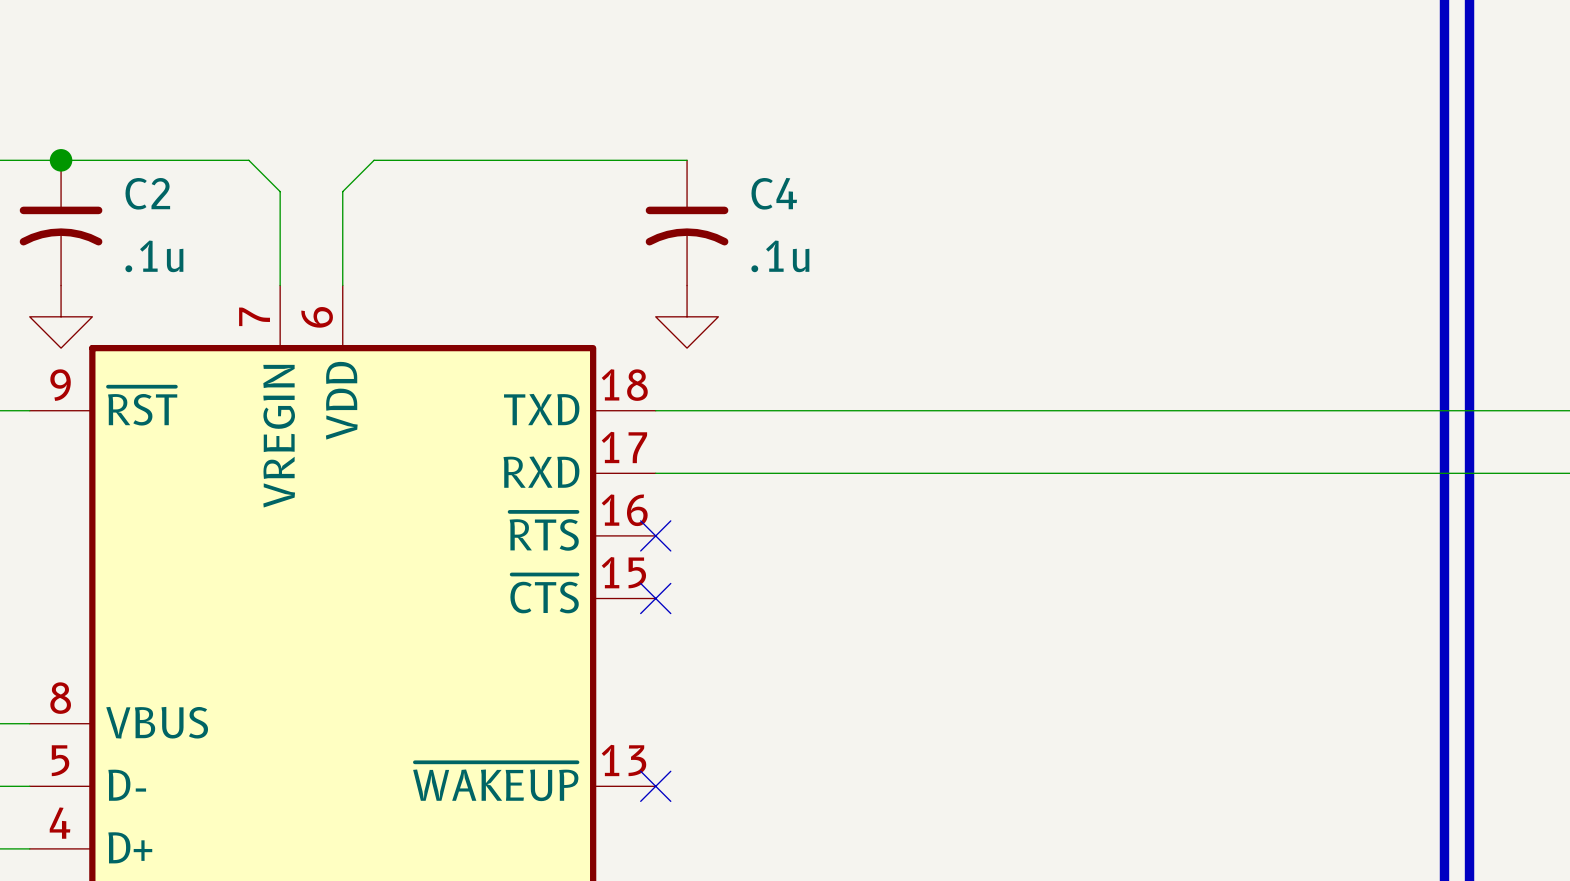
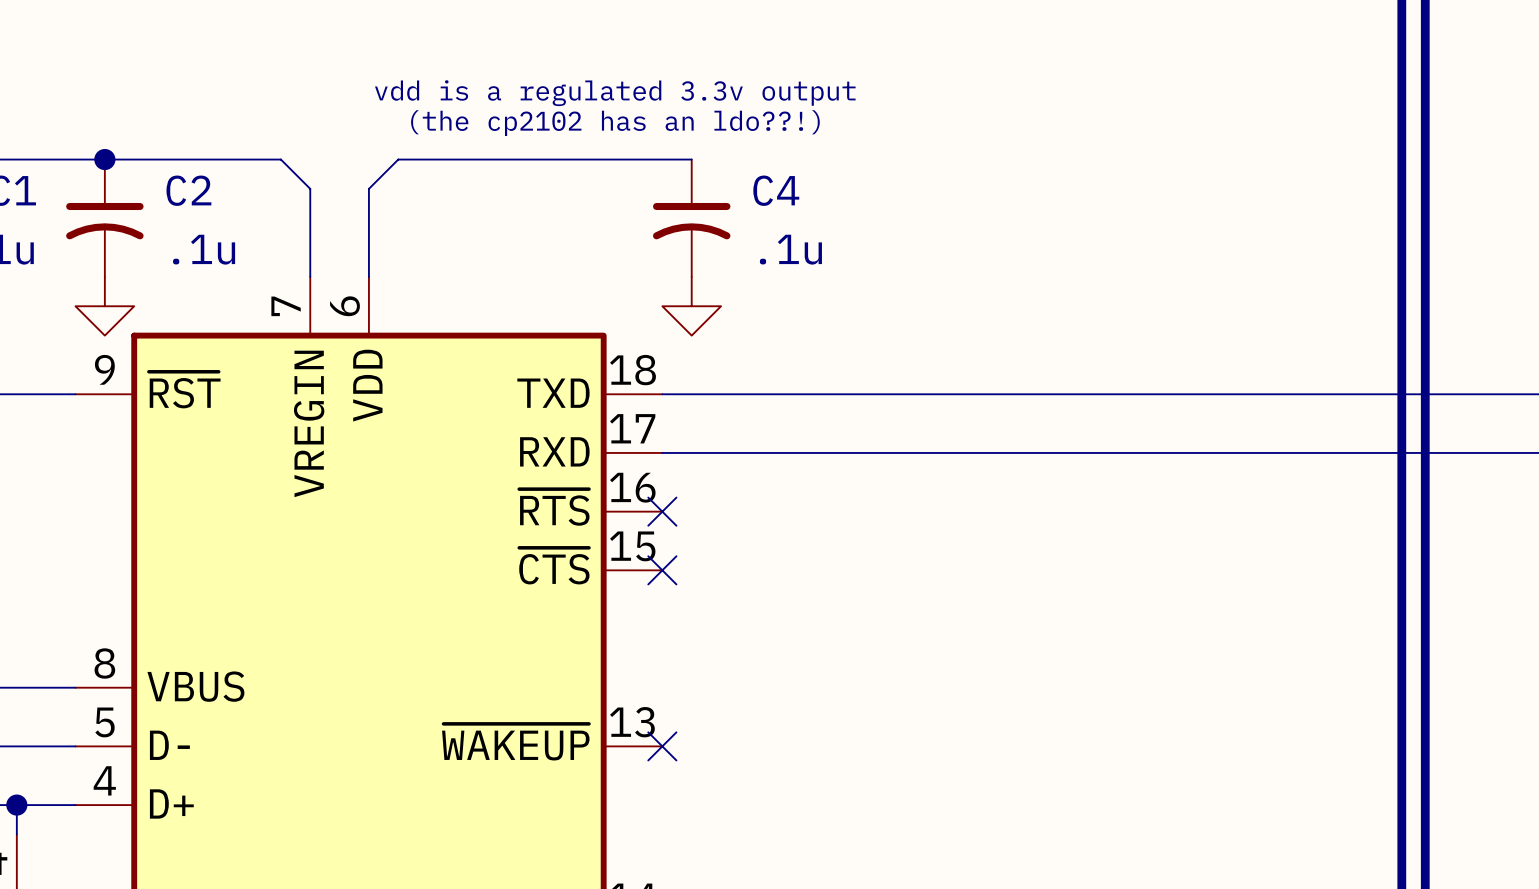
text: none -> vdd is a regulated 3.3v output (615, 93)
text: none -> (the cp2102 has an ldo??!) (615, 123)

